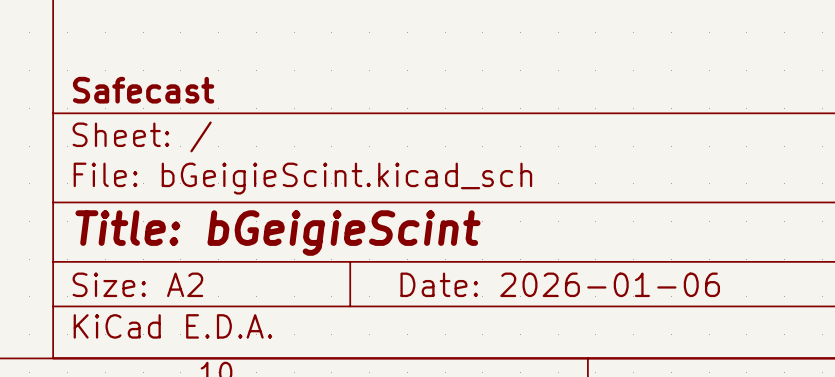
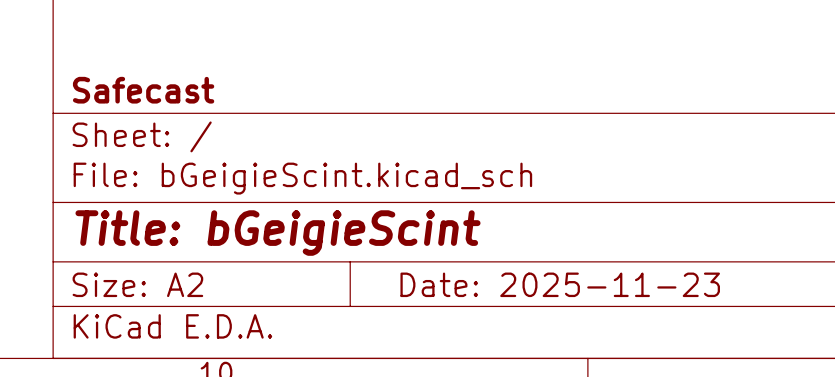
title block: Date: 2026-01-06 (560, 284) -> Date: 2025-11-23 (560, 284)

